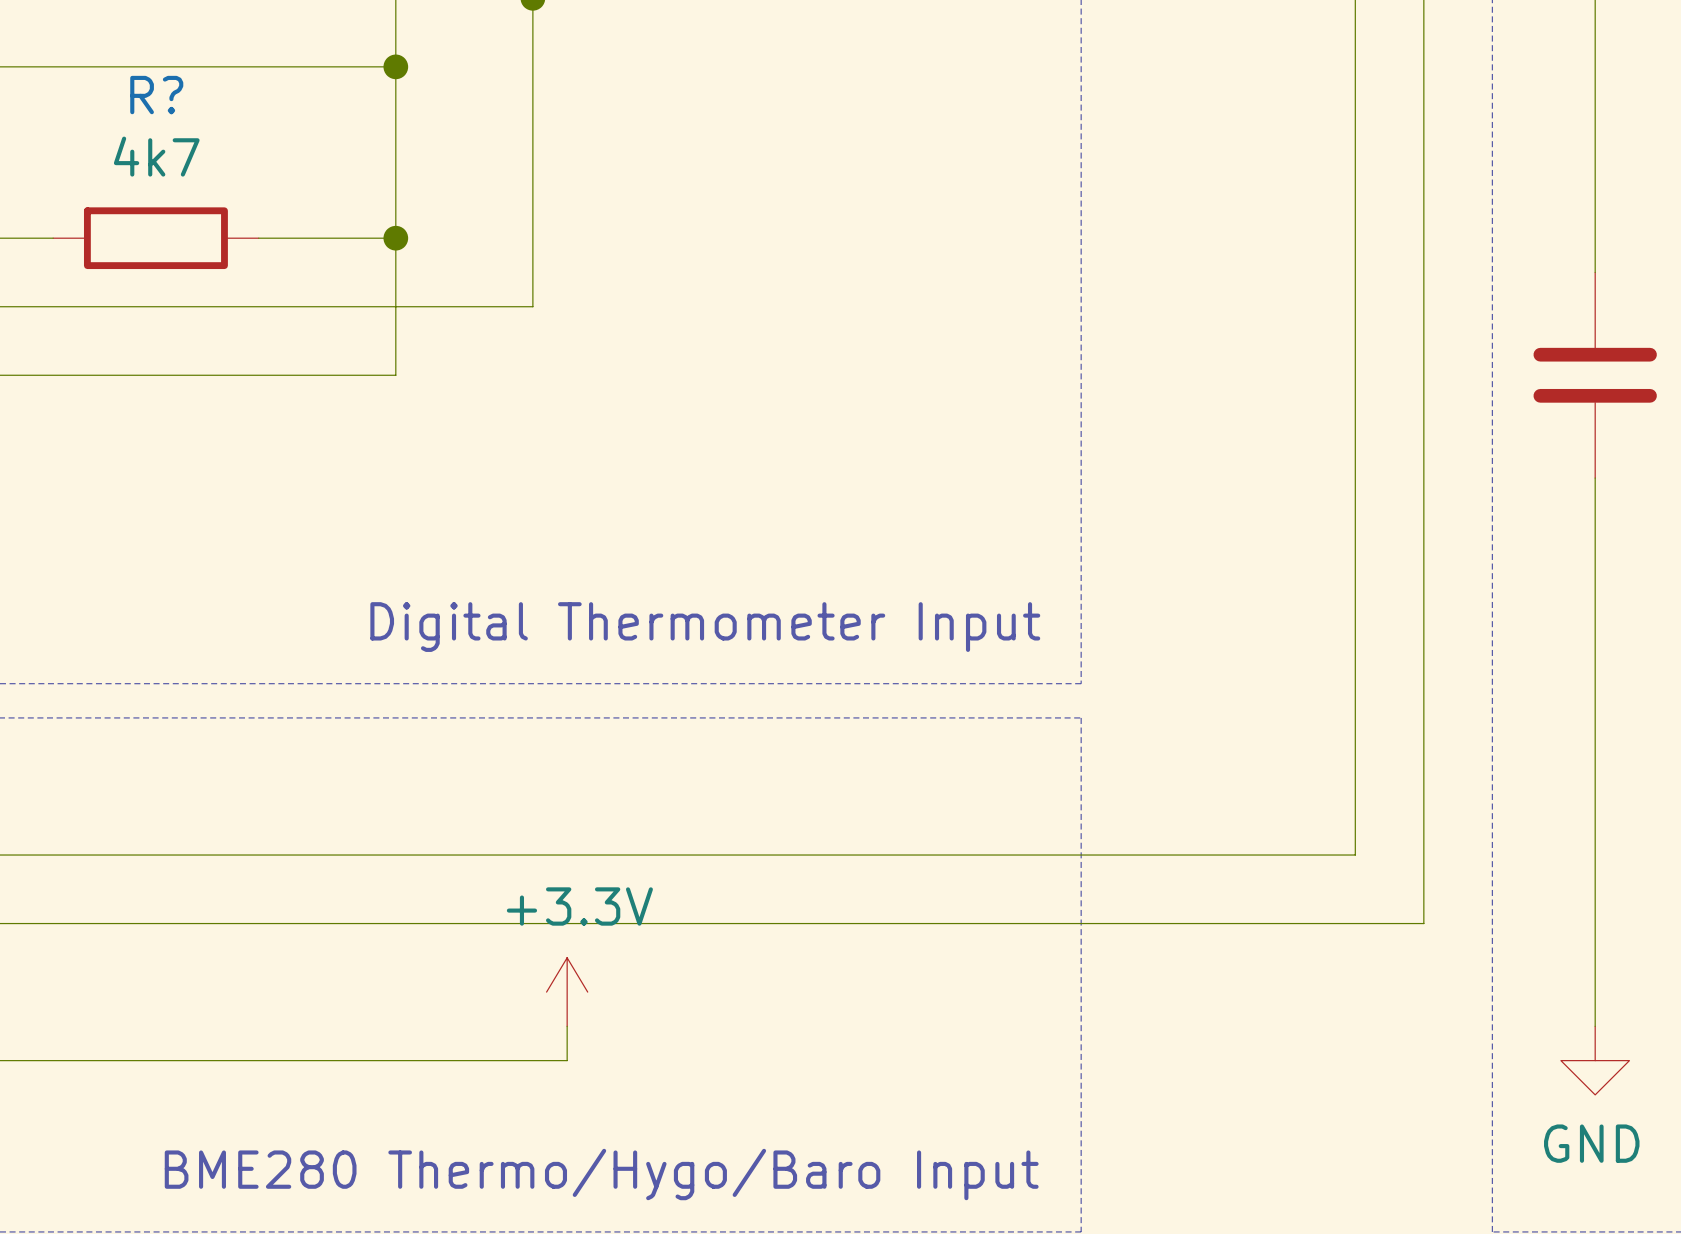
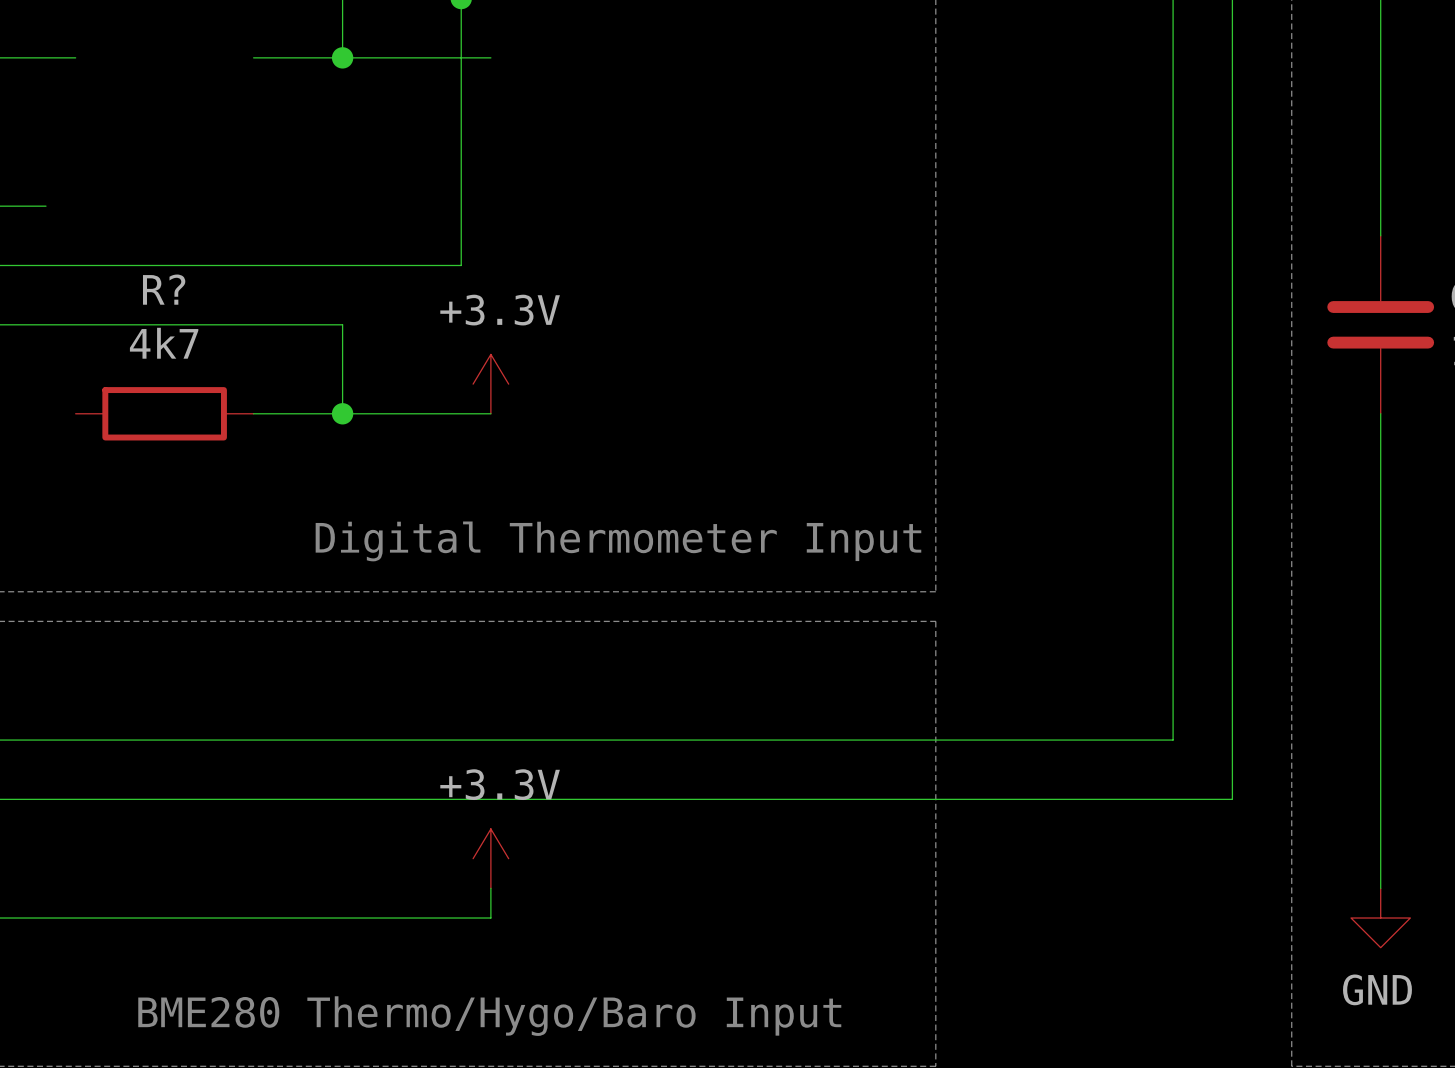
wire: (87, 66) (293, 66) -> none
wire: (395, 66) (395, 375) -> (342, 57) (490, 57)
R? position: (155, 238) -> (164, 413)
wire: (258, 238) (395, 238) -> none
junction: (395, 238) -> none
wire: none -> (342, 324) (342, 413)
power symbol: none -> +3.3V (490, 384)
wire: none -> (253, 413) (490, 413)
junction: none -> (342, 413)

